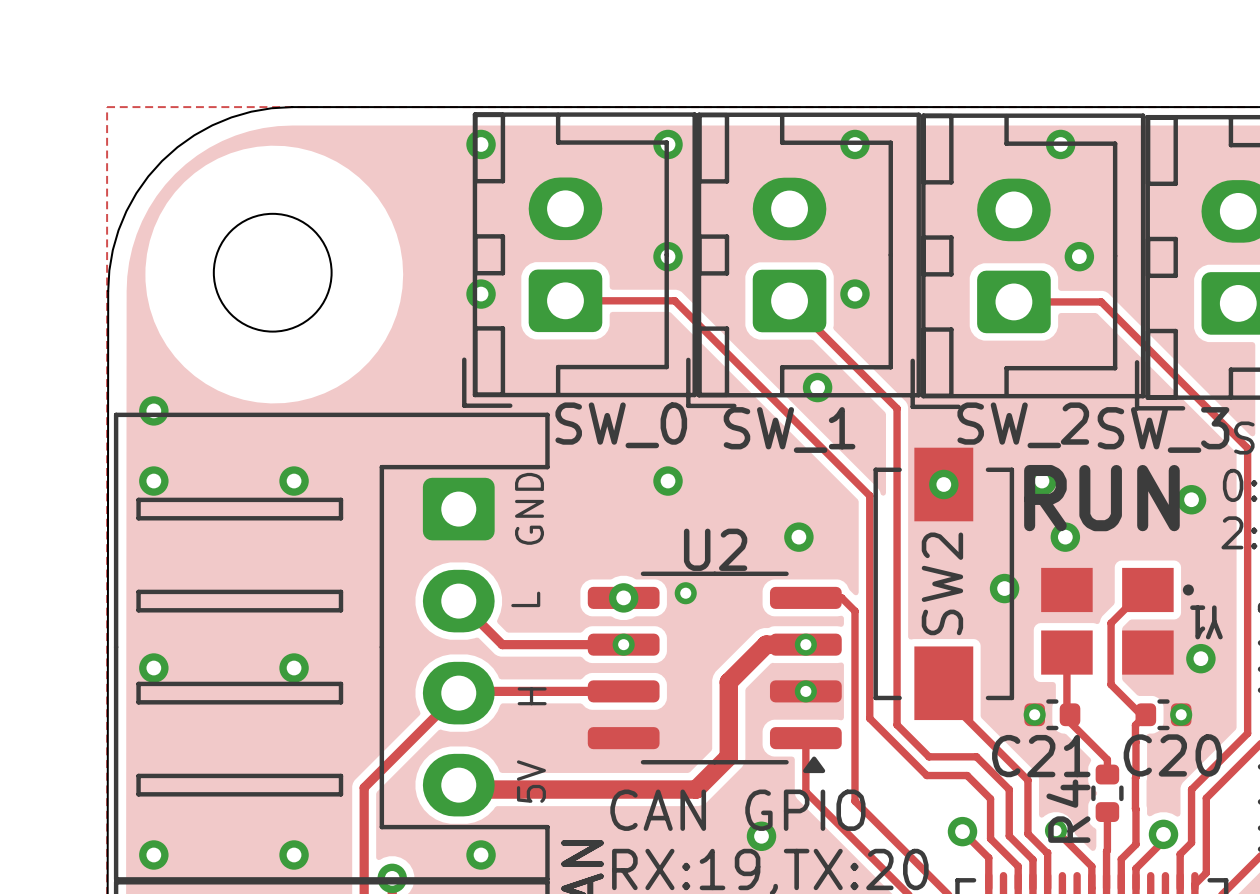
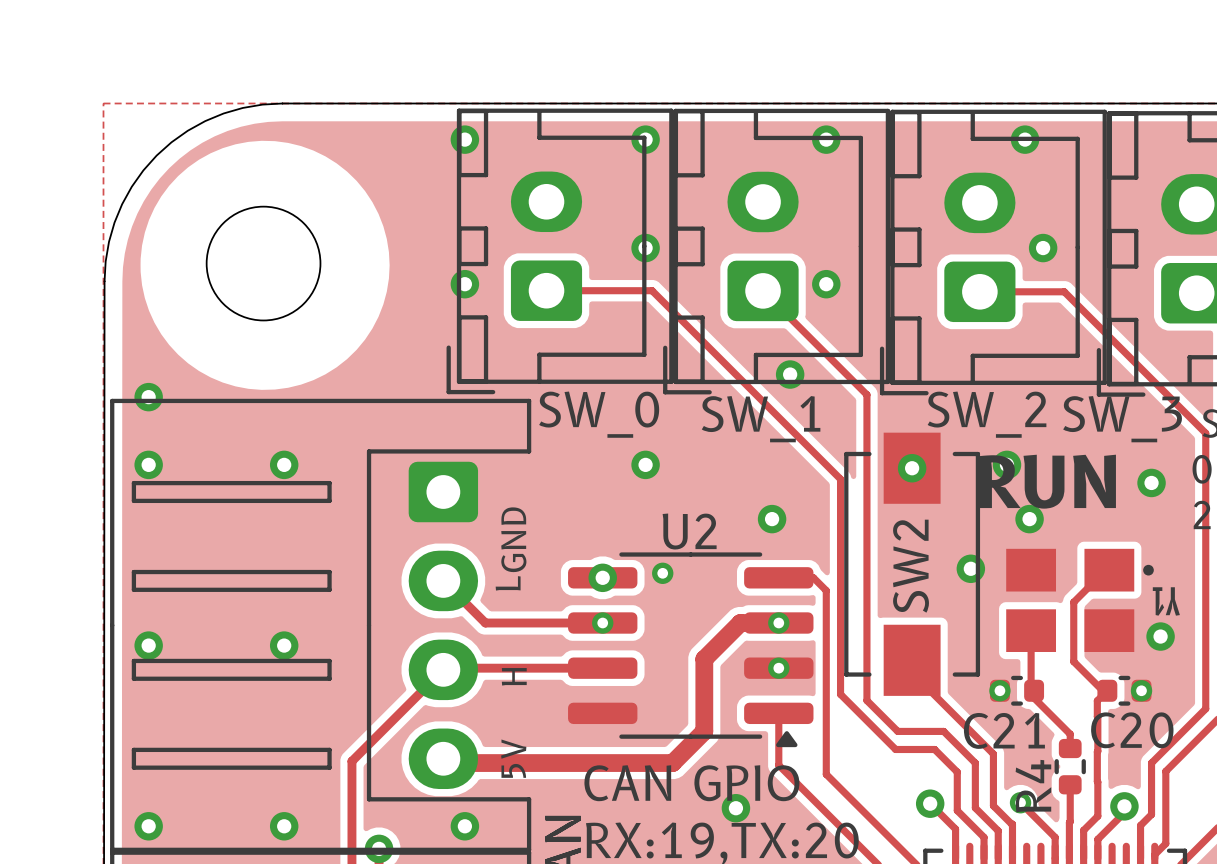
text position: GND (529, 508) -> GND (513, 539)

